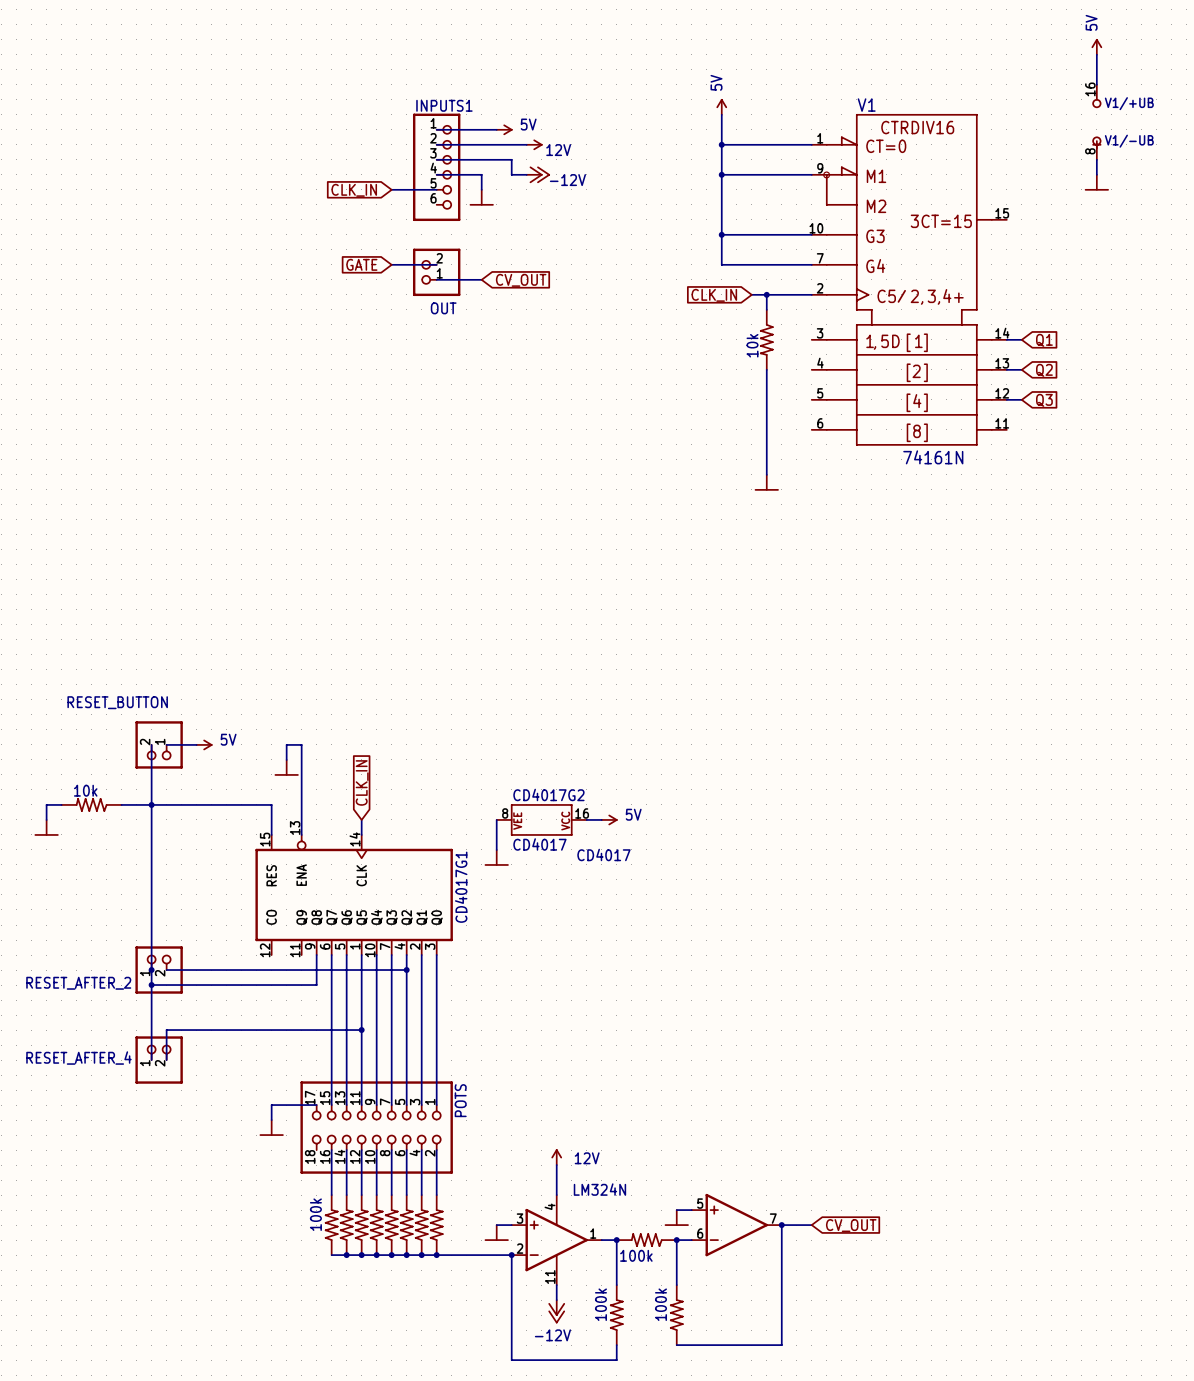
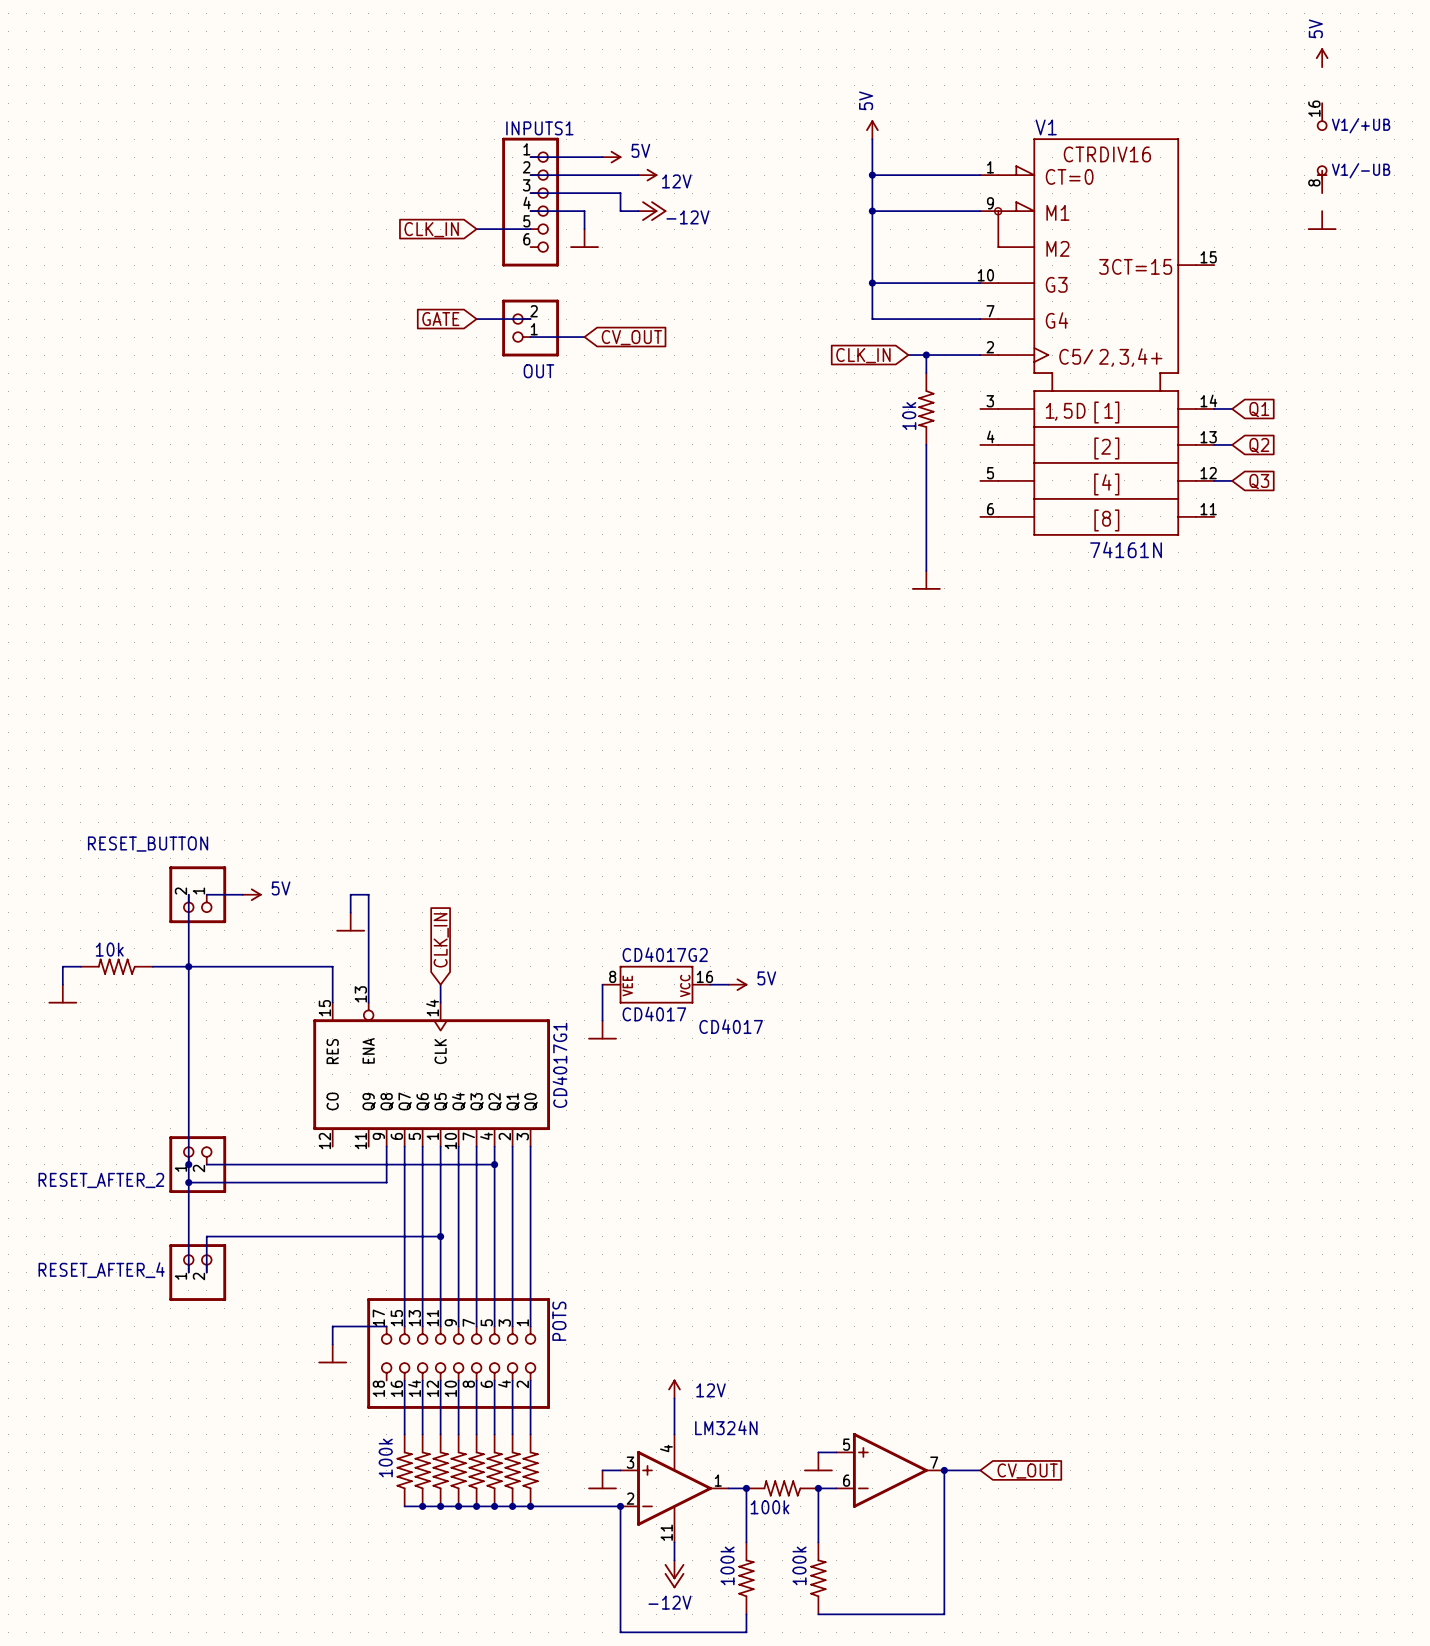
wire: (1096, 54) (1096, 84) -> none
wire: (1096, 159) (1096, 174) -> none

